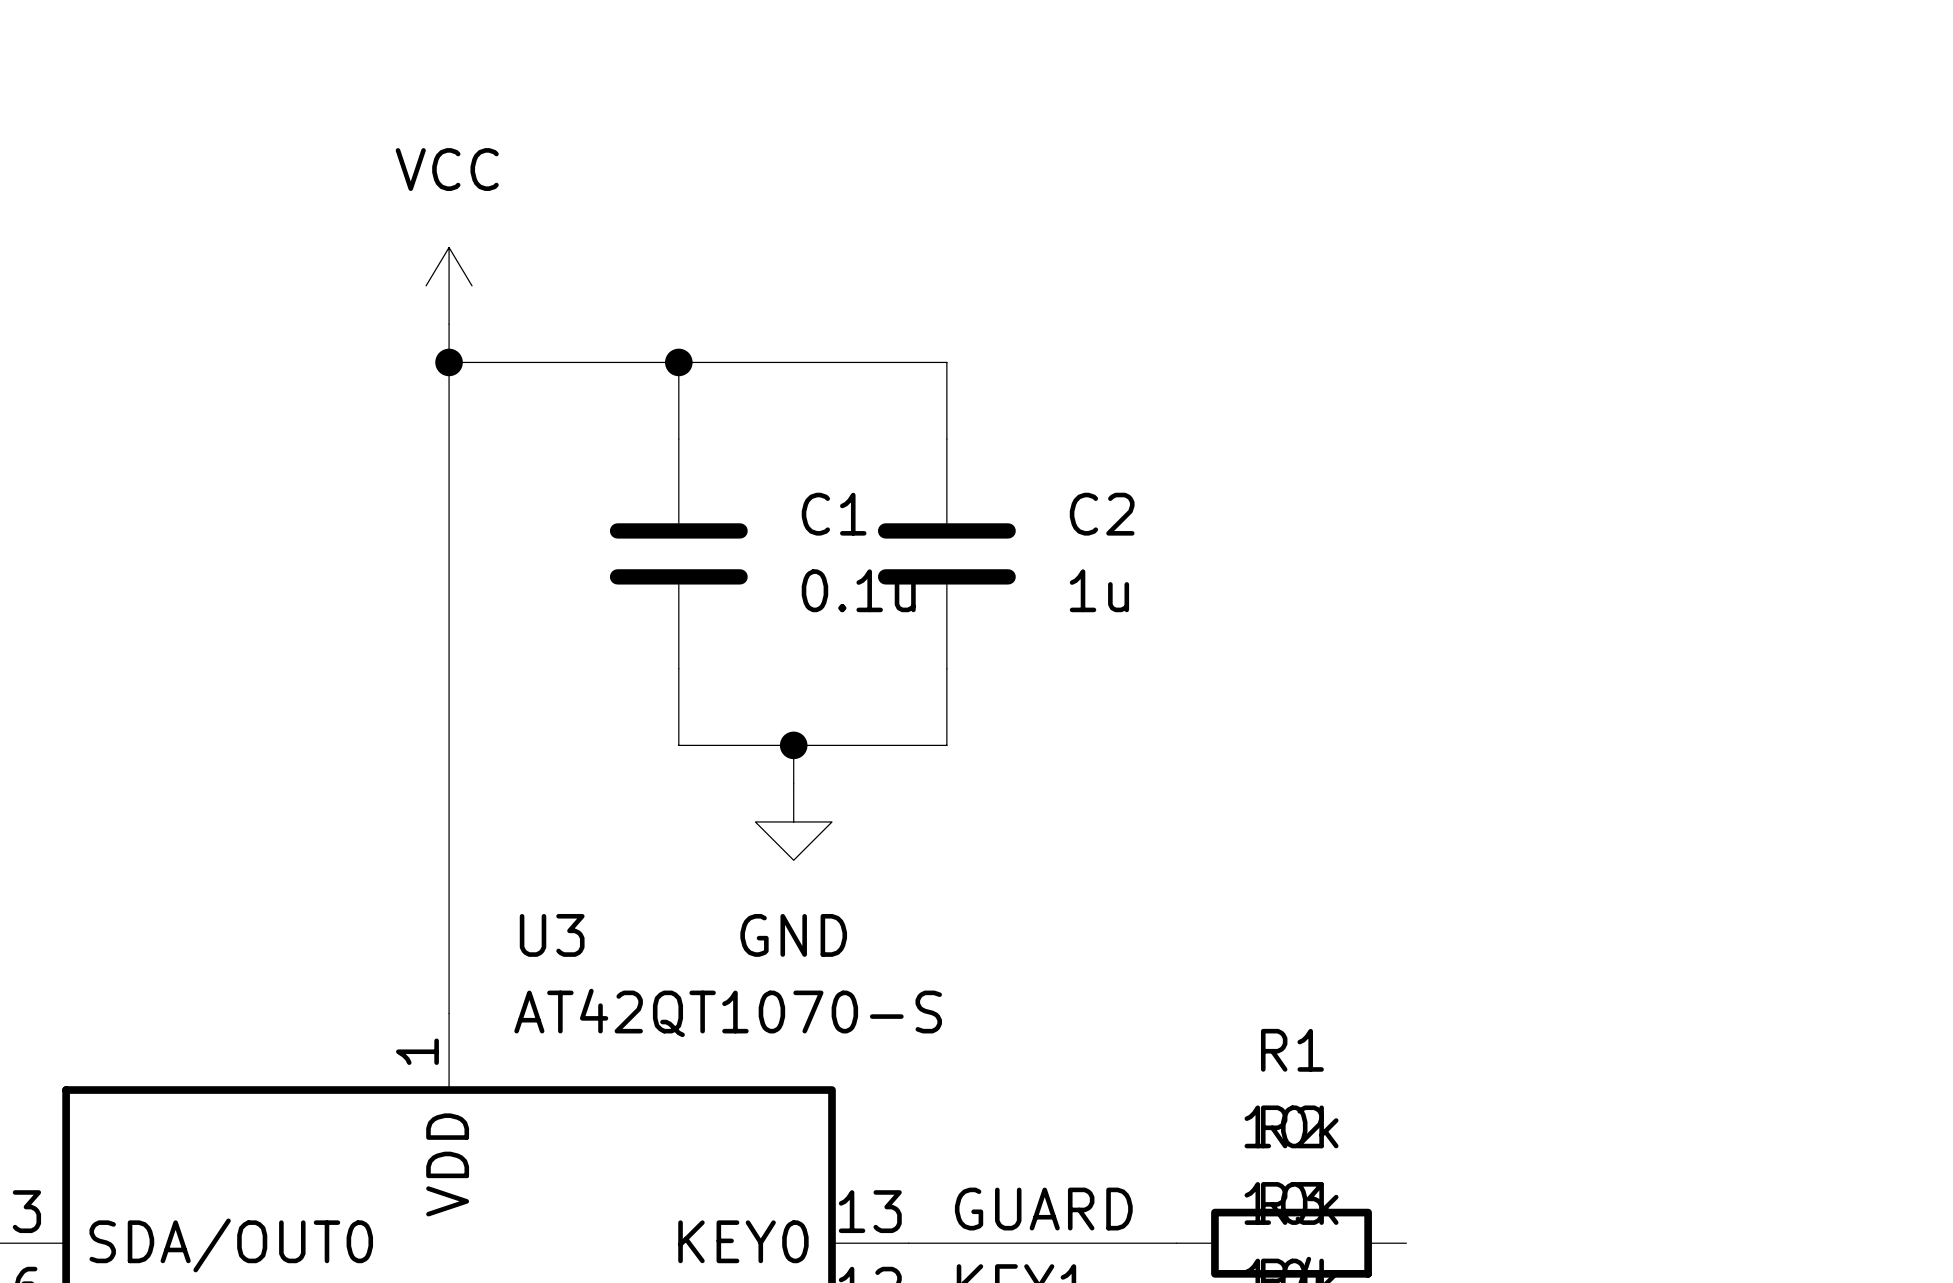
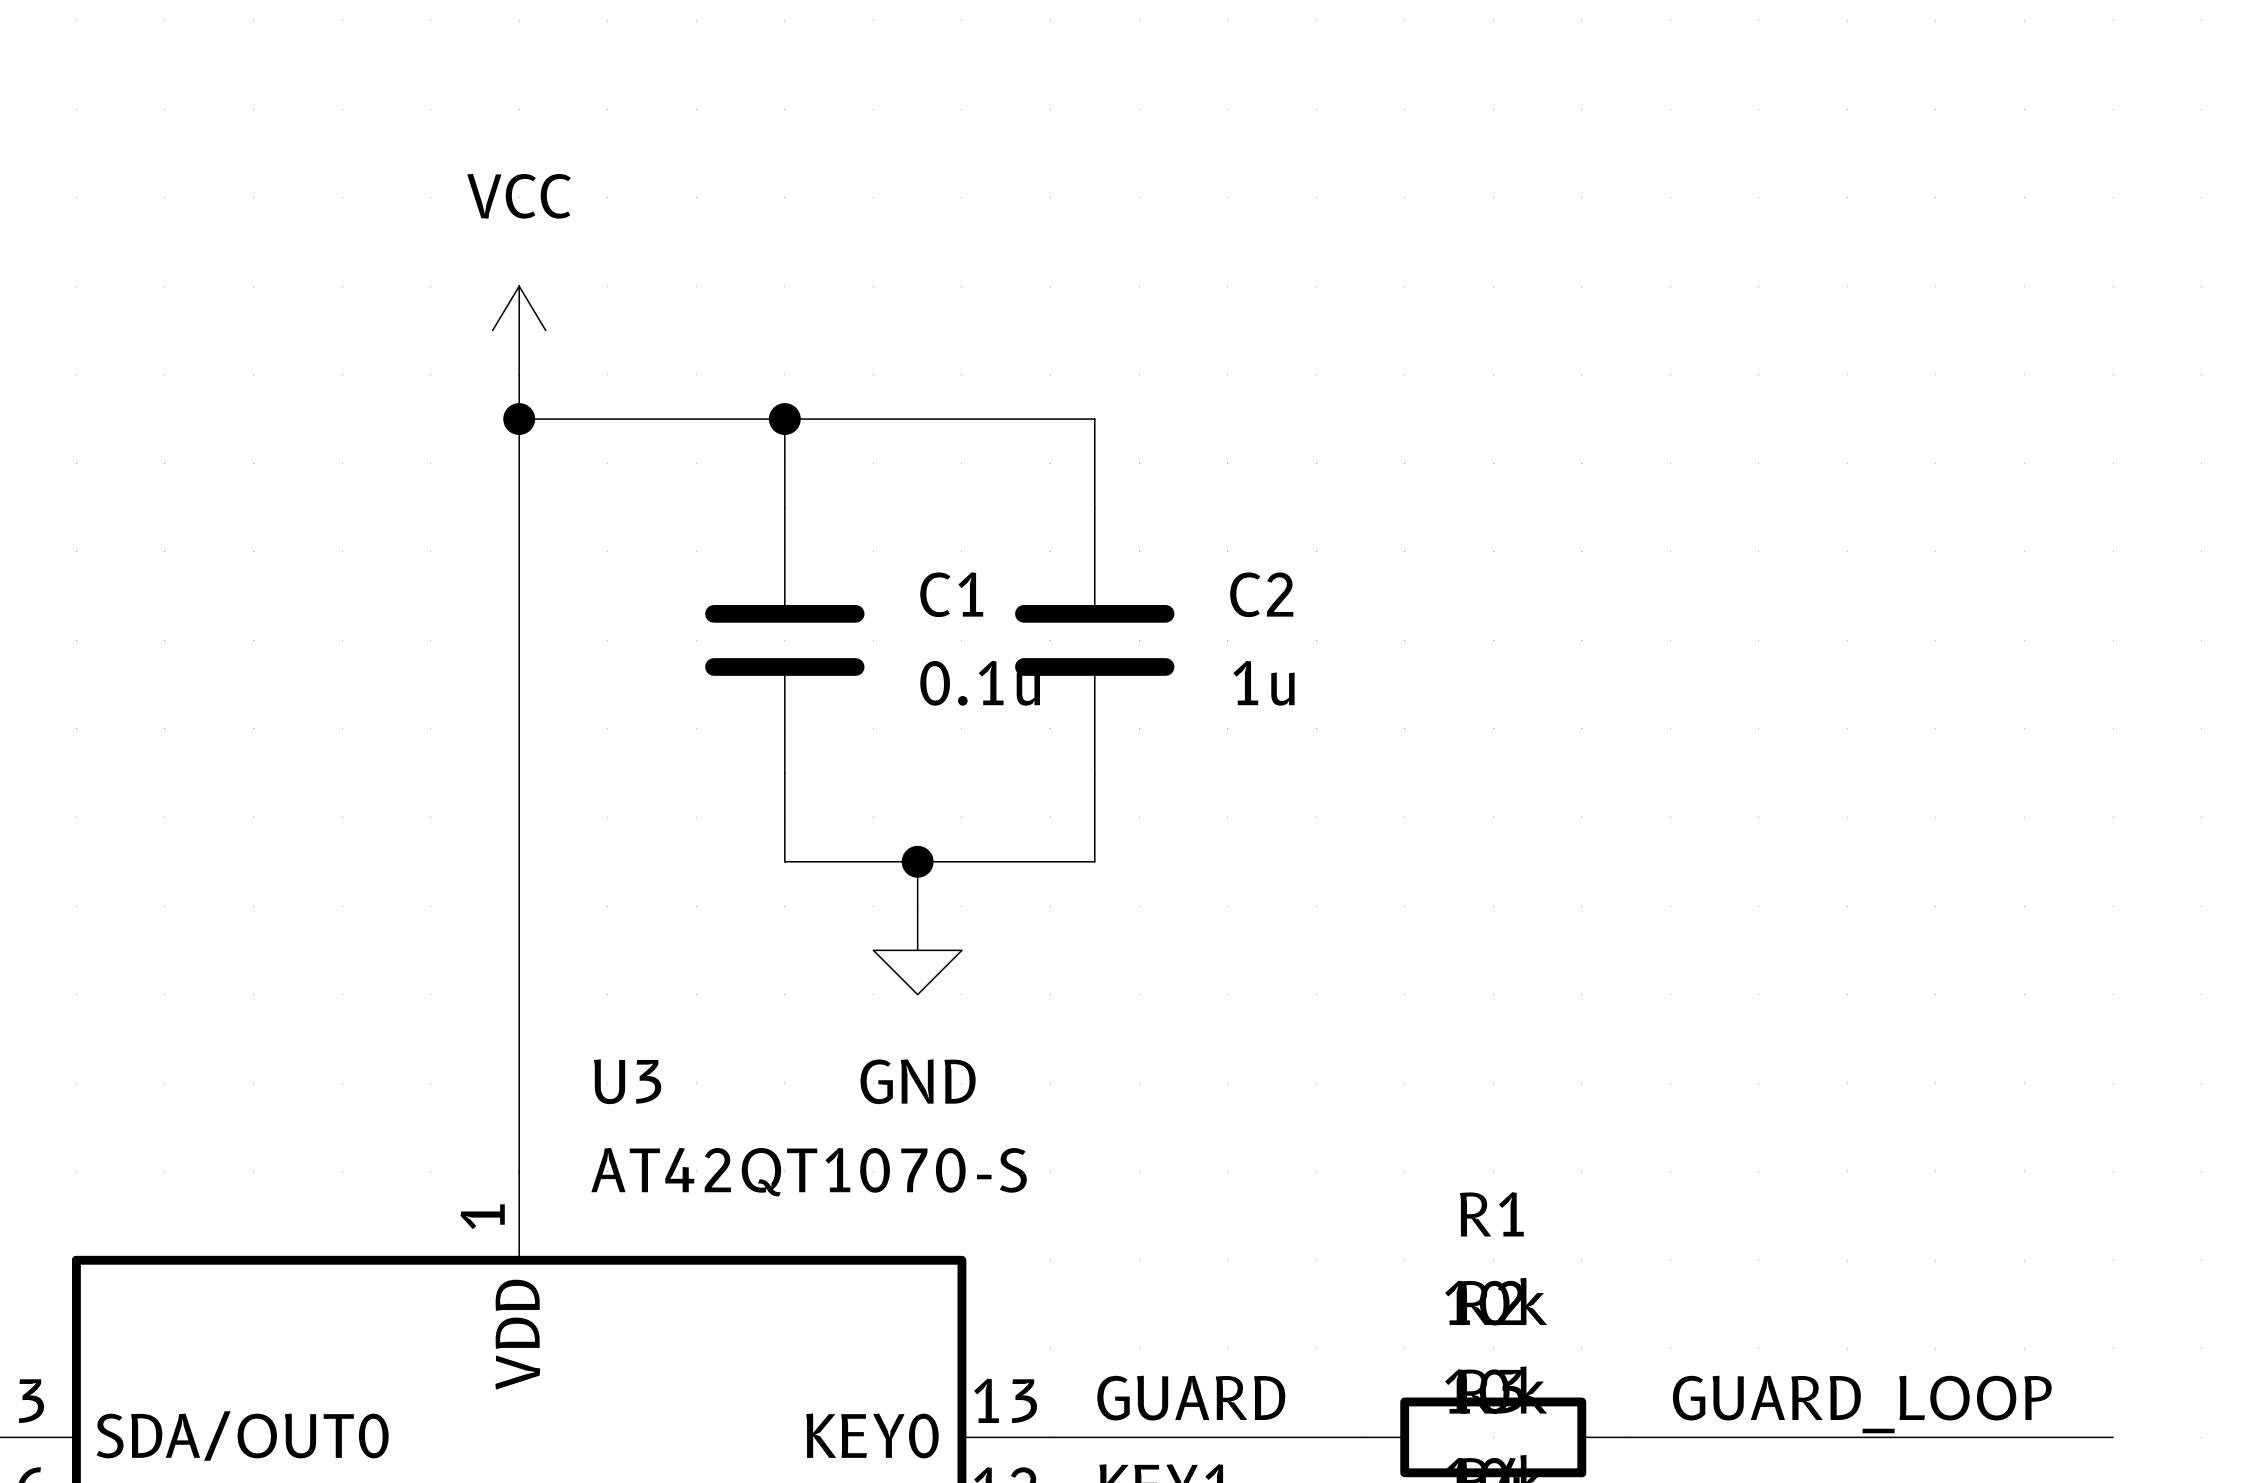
label: none -> GUARD_LOOP (1862, 1404)
wire: none -> (1626, 1437) (2113, 1437)

